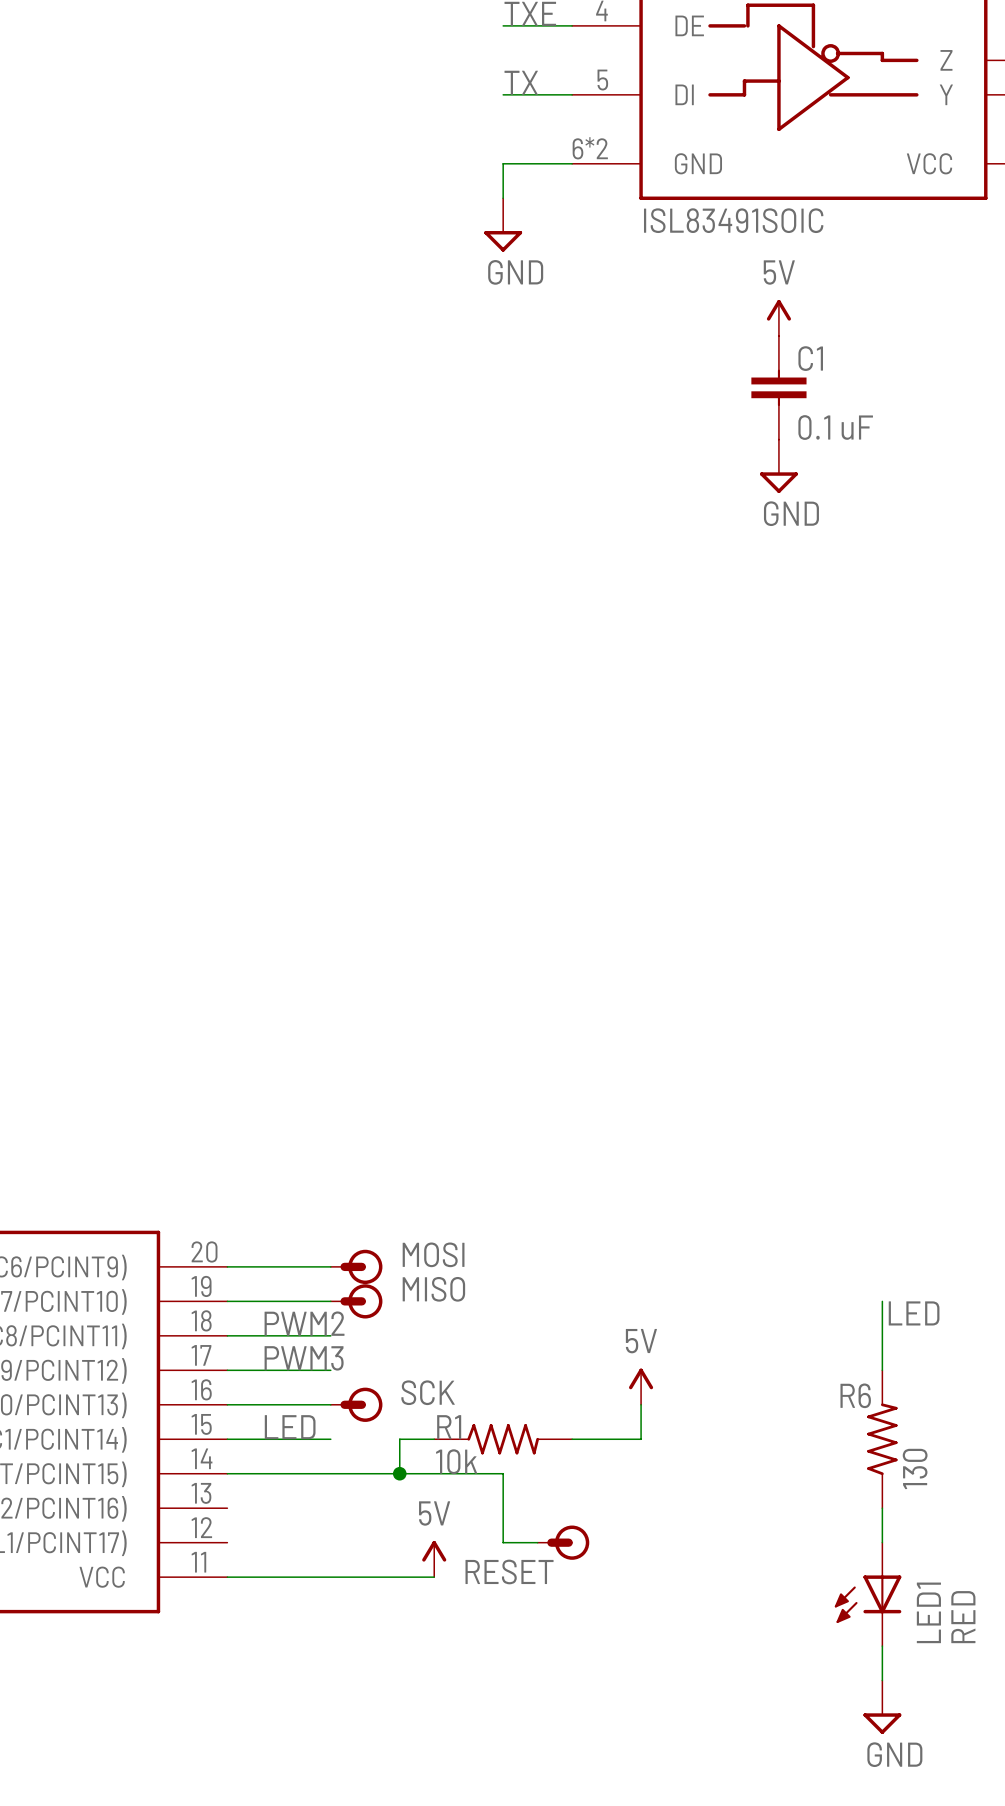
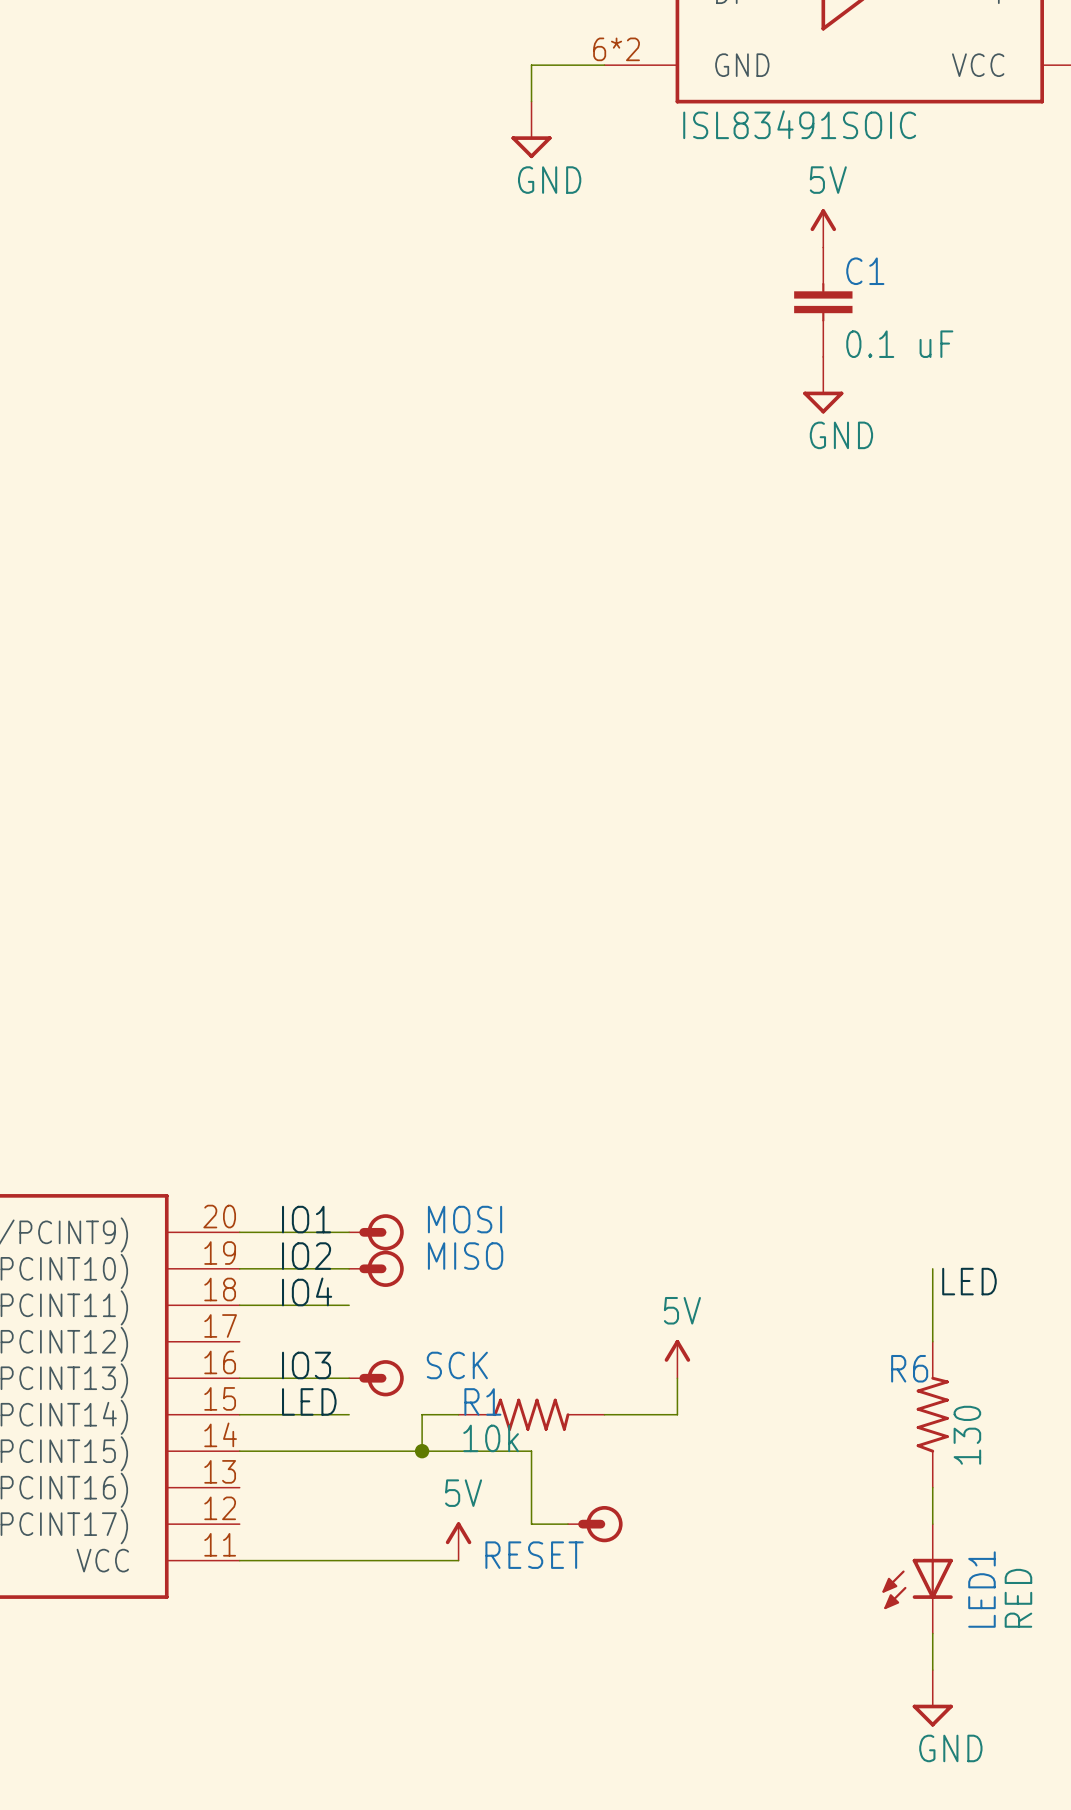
label: none -> IO1 (306, 1219)
label: none -> IO2 (306, 1256)
label: PWM2 (304, 1323) -> IO4 (307, 1291)
label: PWM3 (304, 1358) -> none
wire: (227, 1370) (330, 1370) -> none
label: none -> IO3 (306, 1365)

